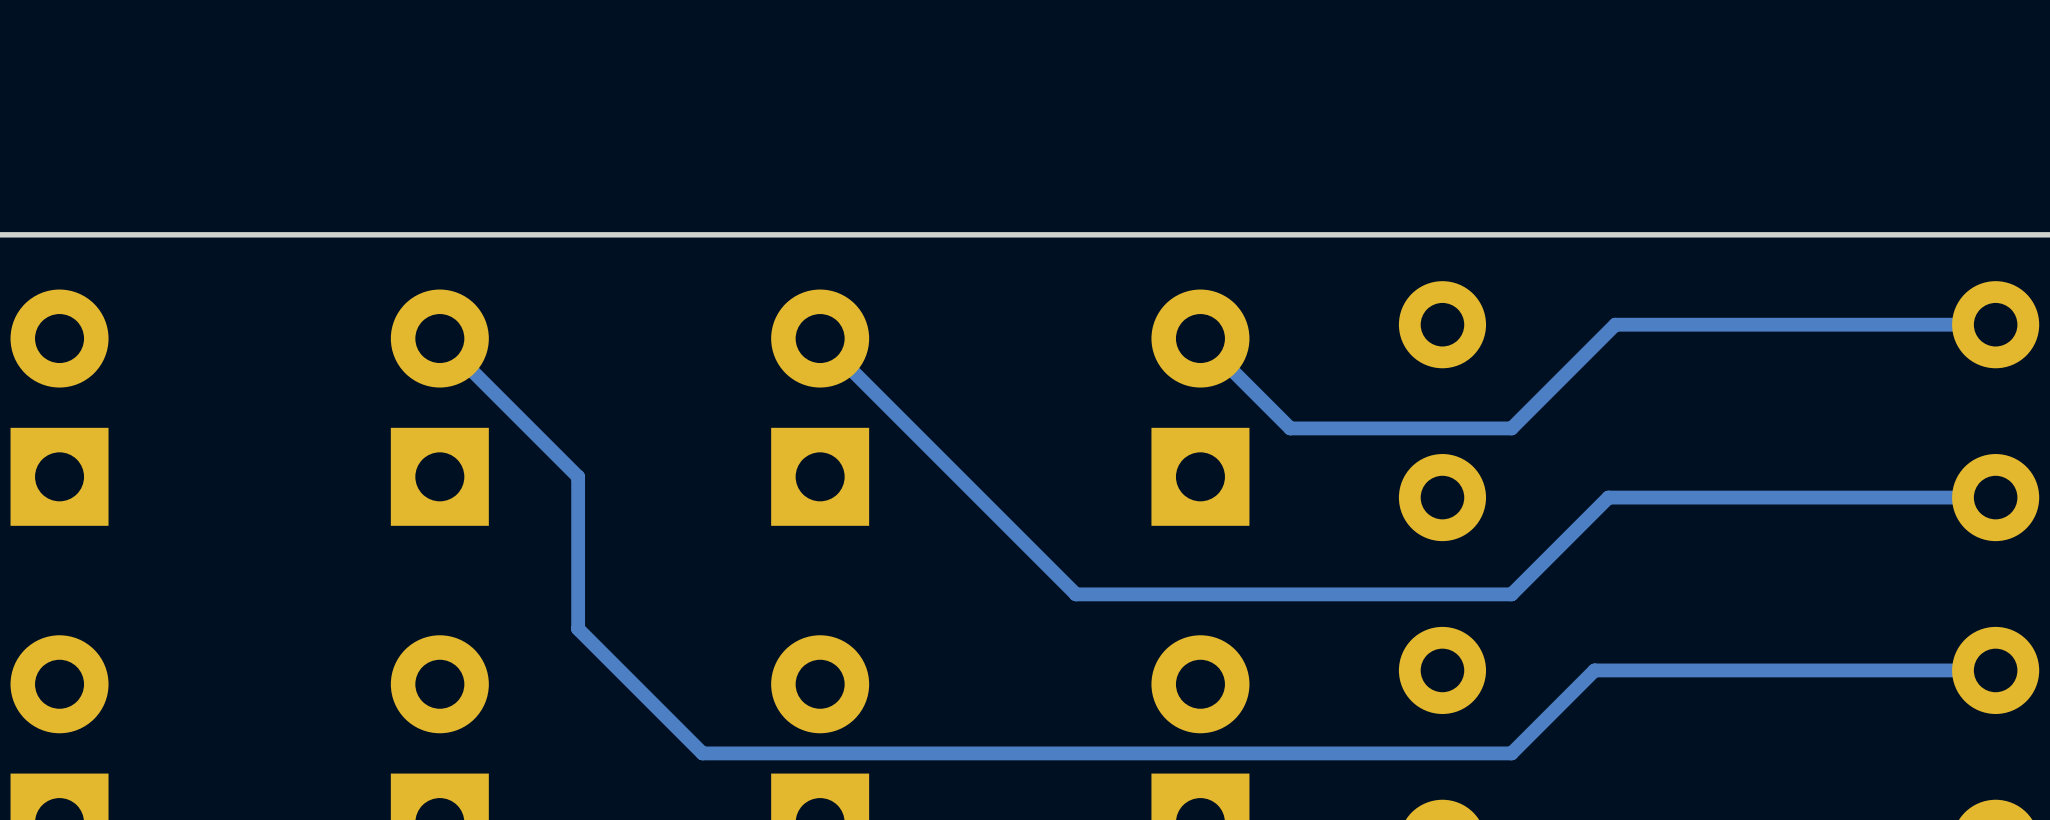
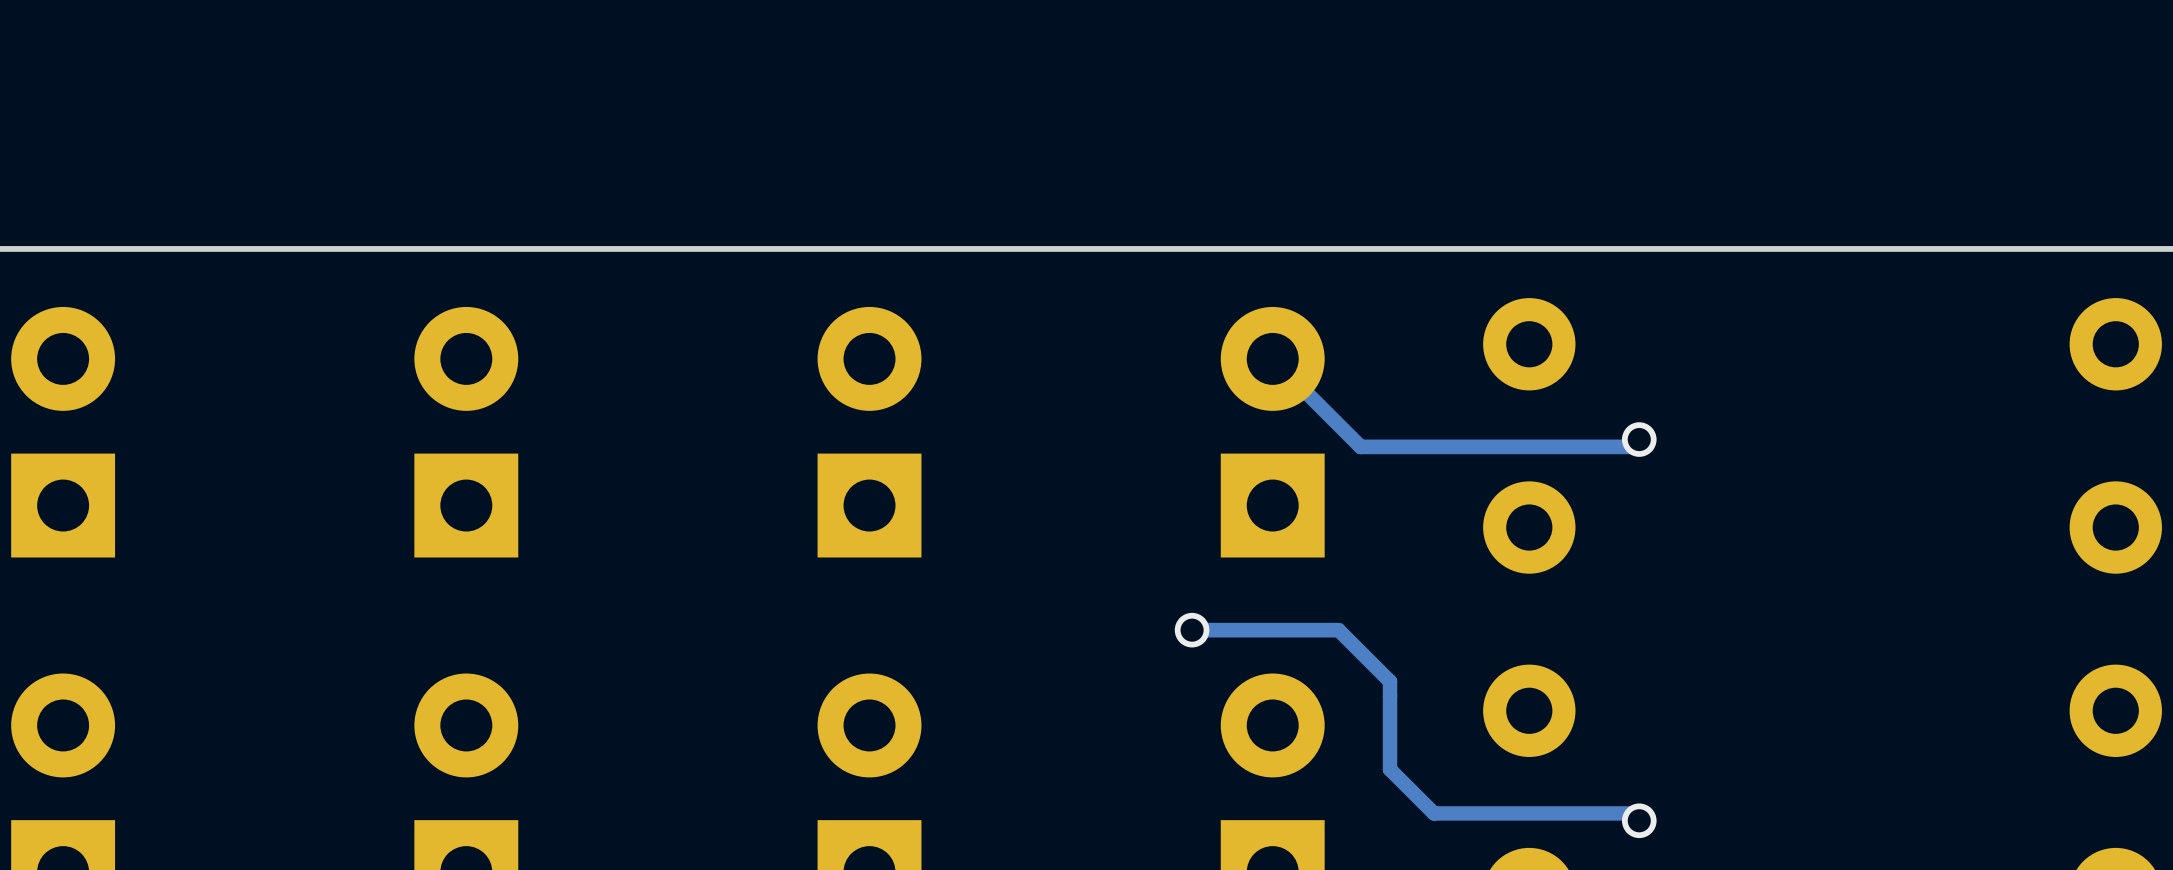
track: (1995, 324) (1615, 324) (1511, 428) (1290, 428) (1283, 421) -> (1639, 439) (1631, 446) (1360, 446)
track: (439, 338) (578, 476) (578, 628) (702, 753) (1511, 753) (1594, 670) (1995, 670) -> none
track: (840, 338) (820, 338) (1075, 594) (1124, 594) -> none
via: none -> (1639, 439)
track: (1995, 497) (1608, 497) (1511, 594) (1262, 594) -> (1639, 820) (1631, 813) (1434, 813) (1390, 769) (1390, 681) (1338, 630)
via: none -> (1192, 630)
via: none -> (1639, 820)

